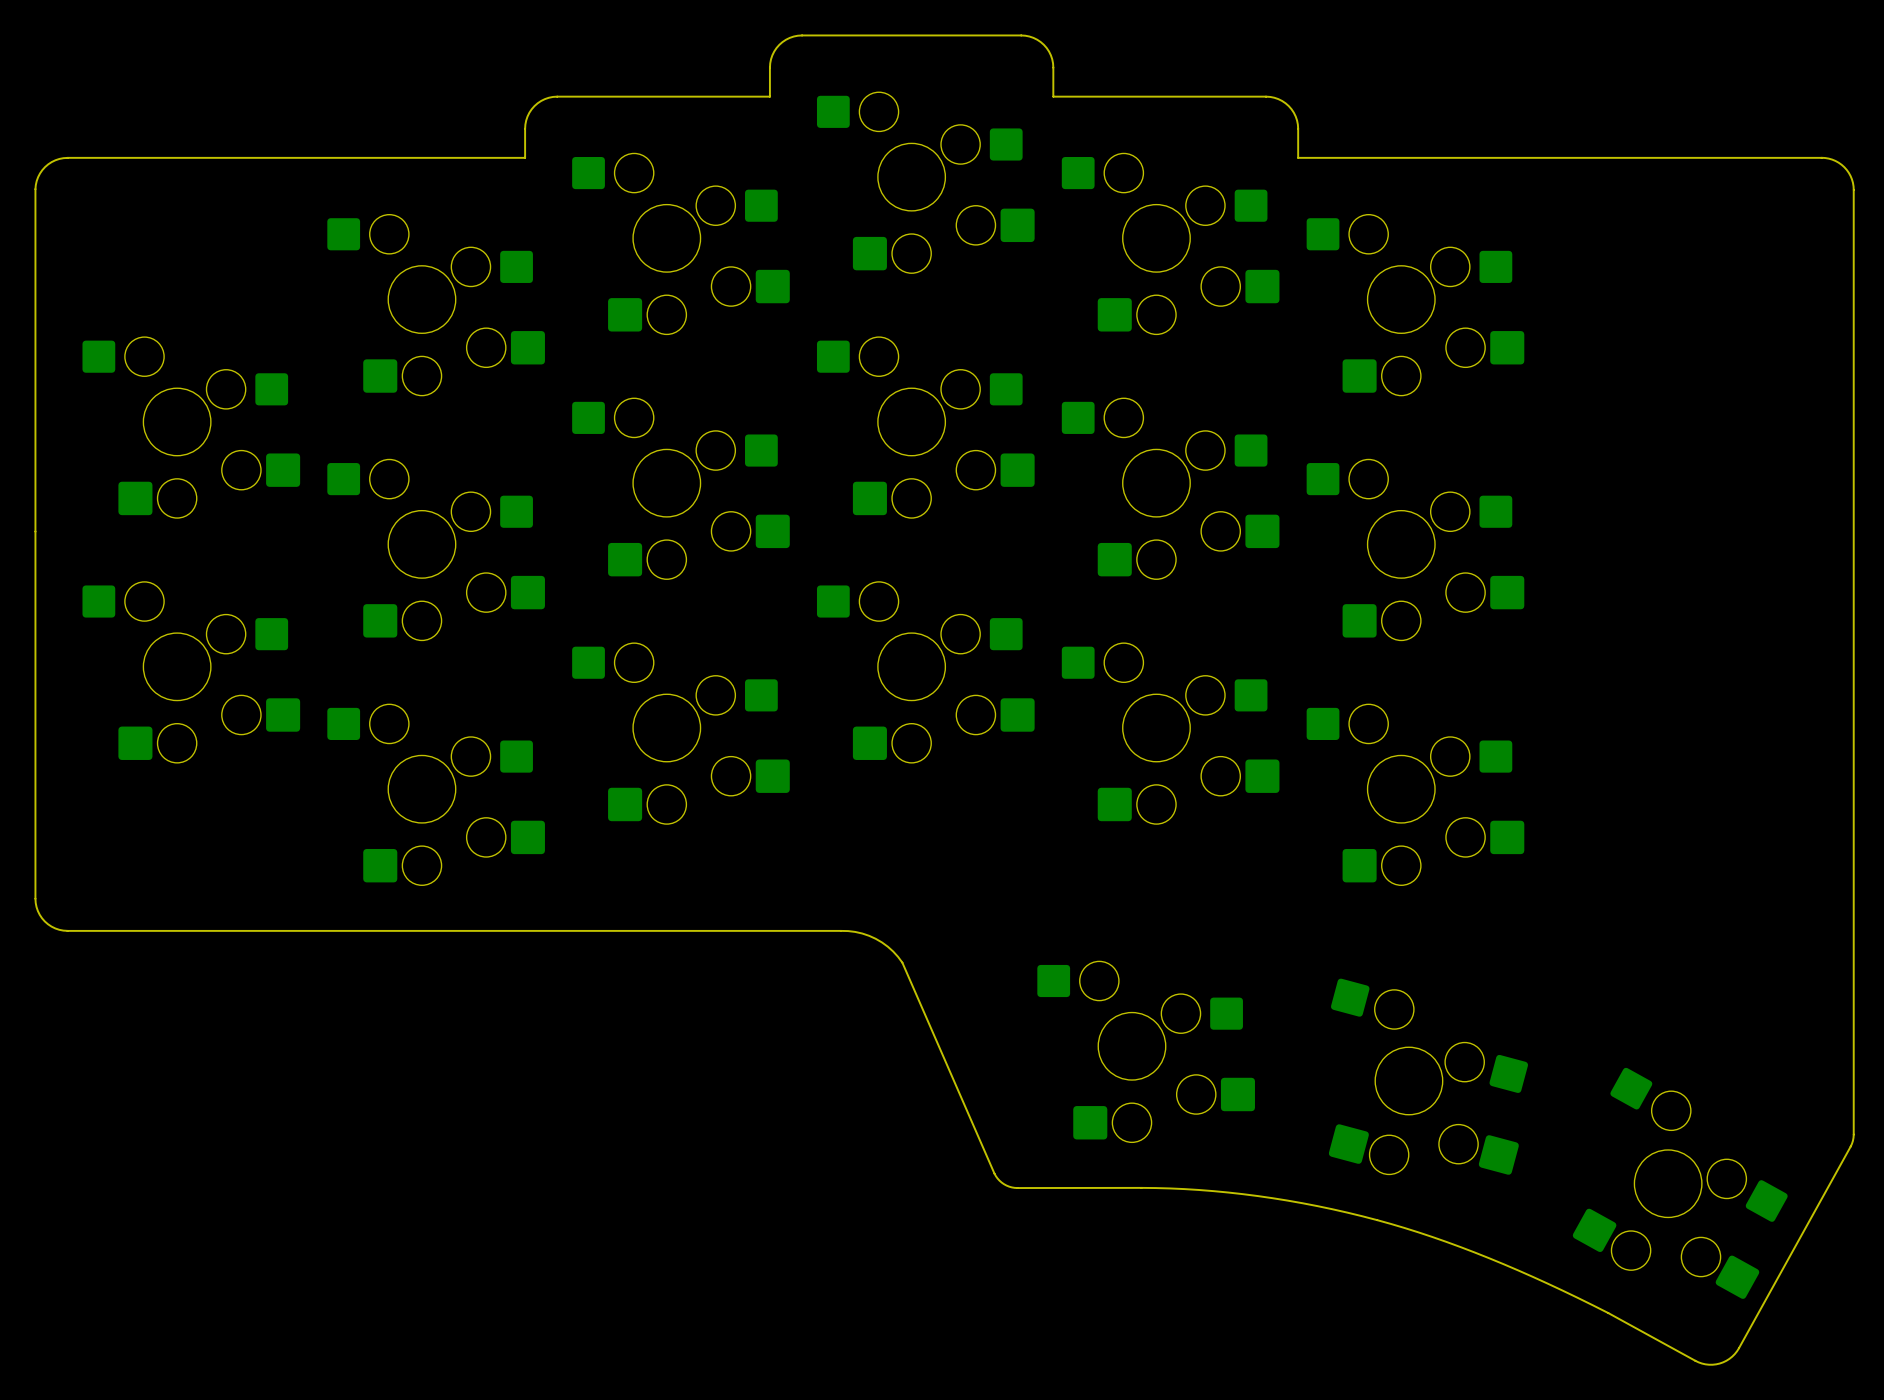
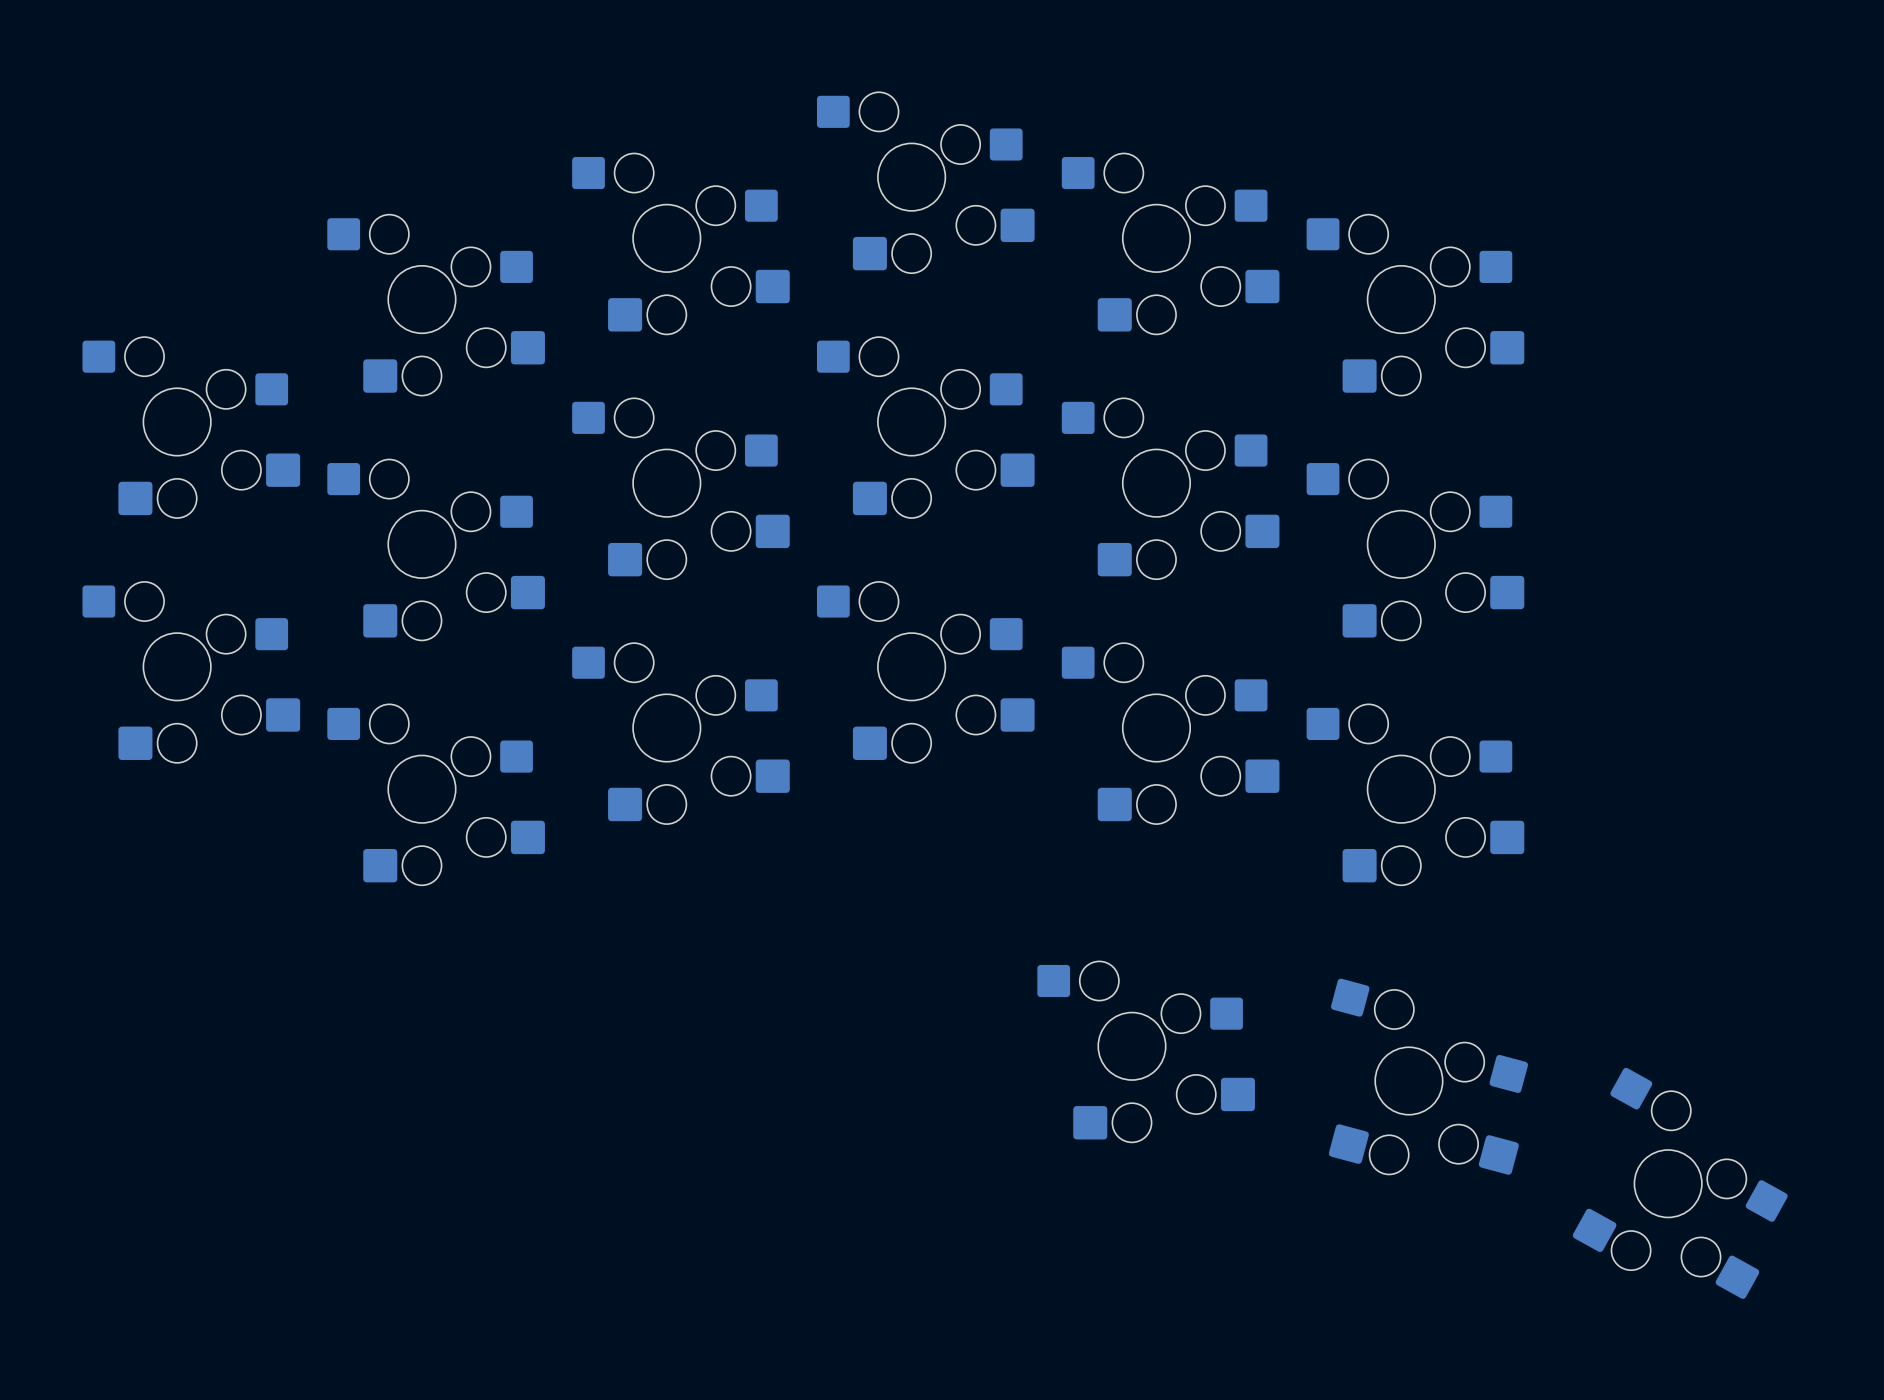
board edge: (67, 157) (525, 157) (526, 120) (531, 109) (544, 99) (557, 96) (769, 96) (769, 67) (772, 55) (782, 42) (793, 36) (1021, 35) (1037, 39) (1049, 51) (1053, 63) (1053, 96) (1266, 96) (1278, 99) (1288, 106) (1297, 120) (1298, 157) (1821, 157) (1832, 159) (1841, 164) (1850, 175) (1853, 189) (1853, 1137) (1850, 1146) (1737, 1351) (1729, 1358) (1719, 1363) (1709, 1364) (1698, 1362) (1608, 1313) (1503, 1264) (1418, 1232) (1347, 1212) (1287, 1200) (1213, 1191) (1155, 1188) (1017, 1188) (1006, 1185) (994, 1173) (902, 962) (887, 946) (862, 933) (840, 930) (67, 930) (55, 928) (48, 924) (37, 911) (35, 898) (35, 189) (38, 177) (45, 167) (55, 160) (67, 157) -> none

